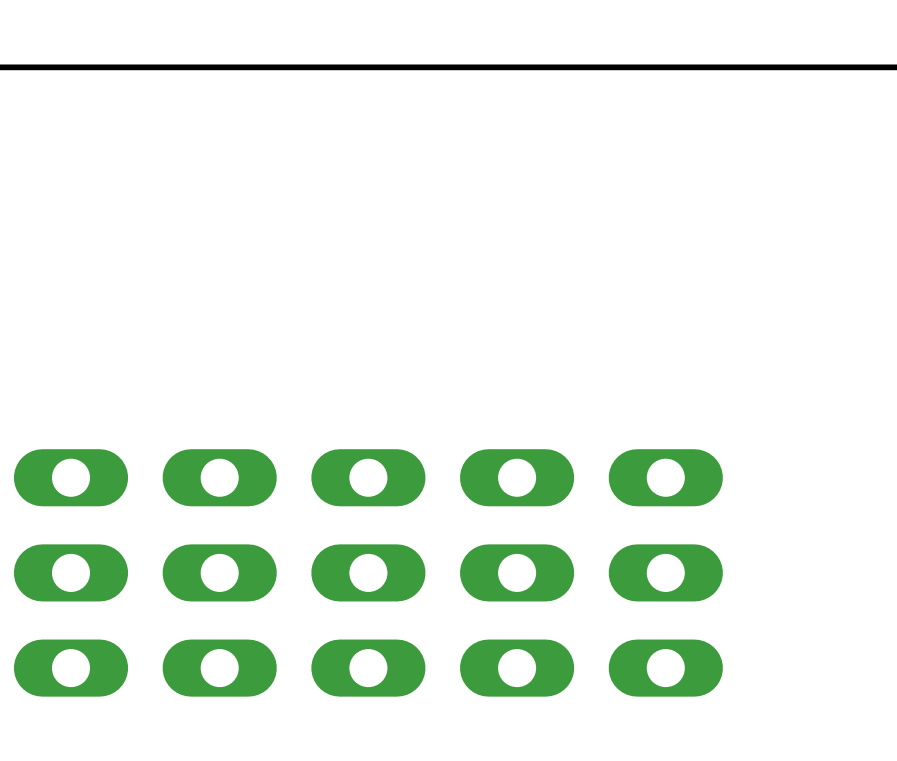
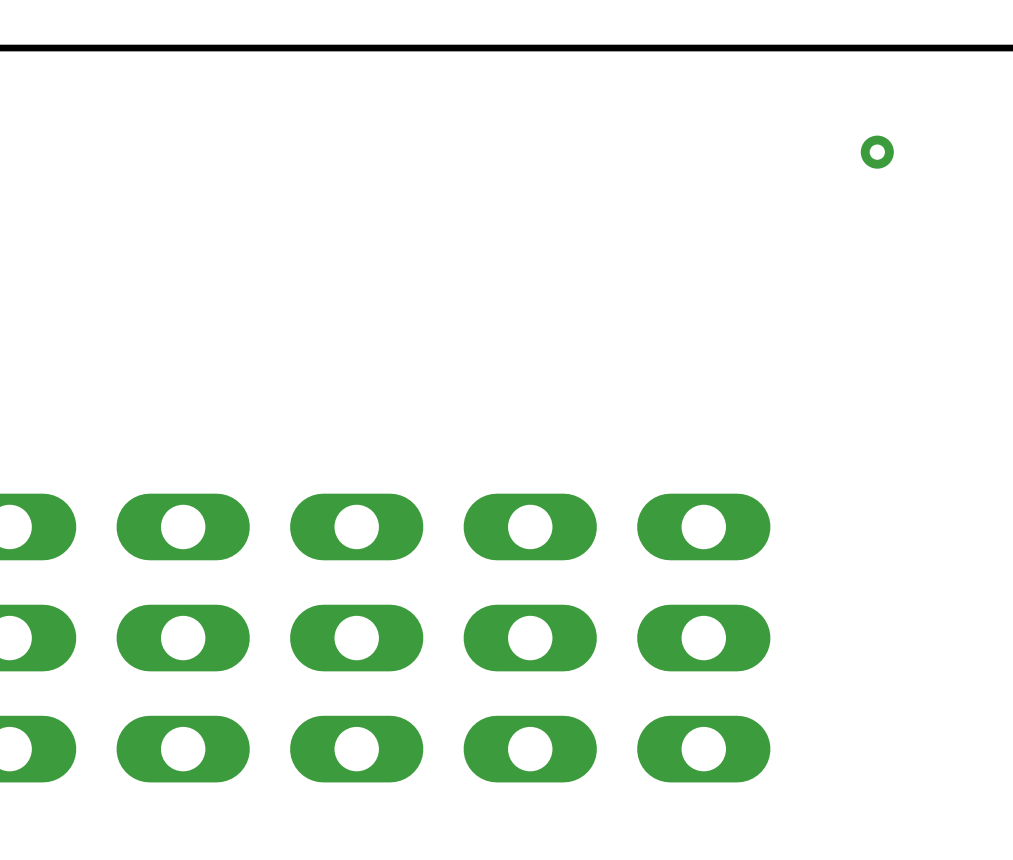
via: none -> (877, 152)

